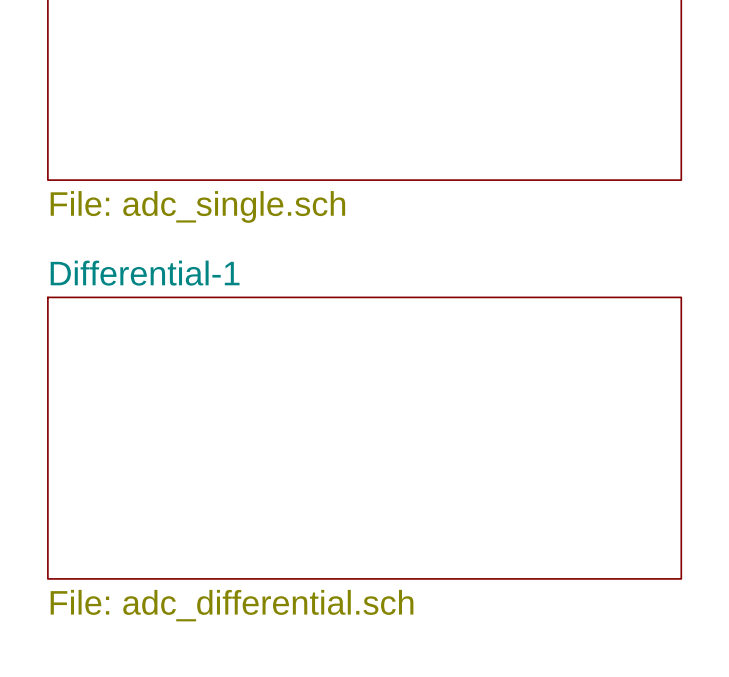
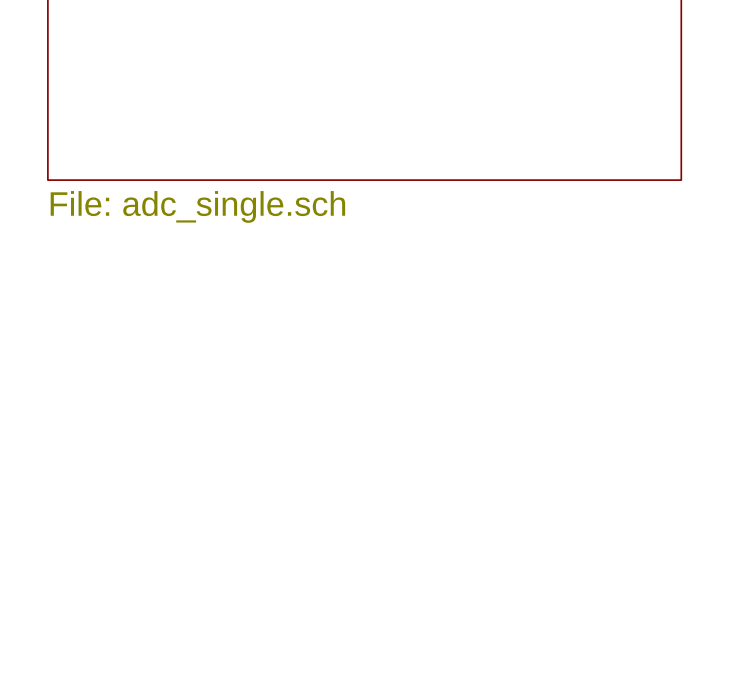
sheet Differential-1: File: adc_differential.sch (364, 438) -> none

